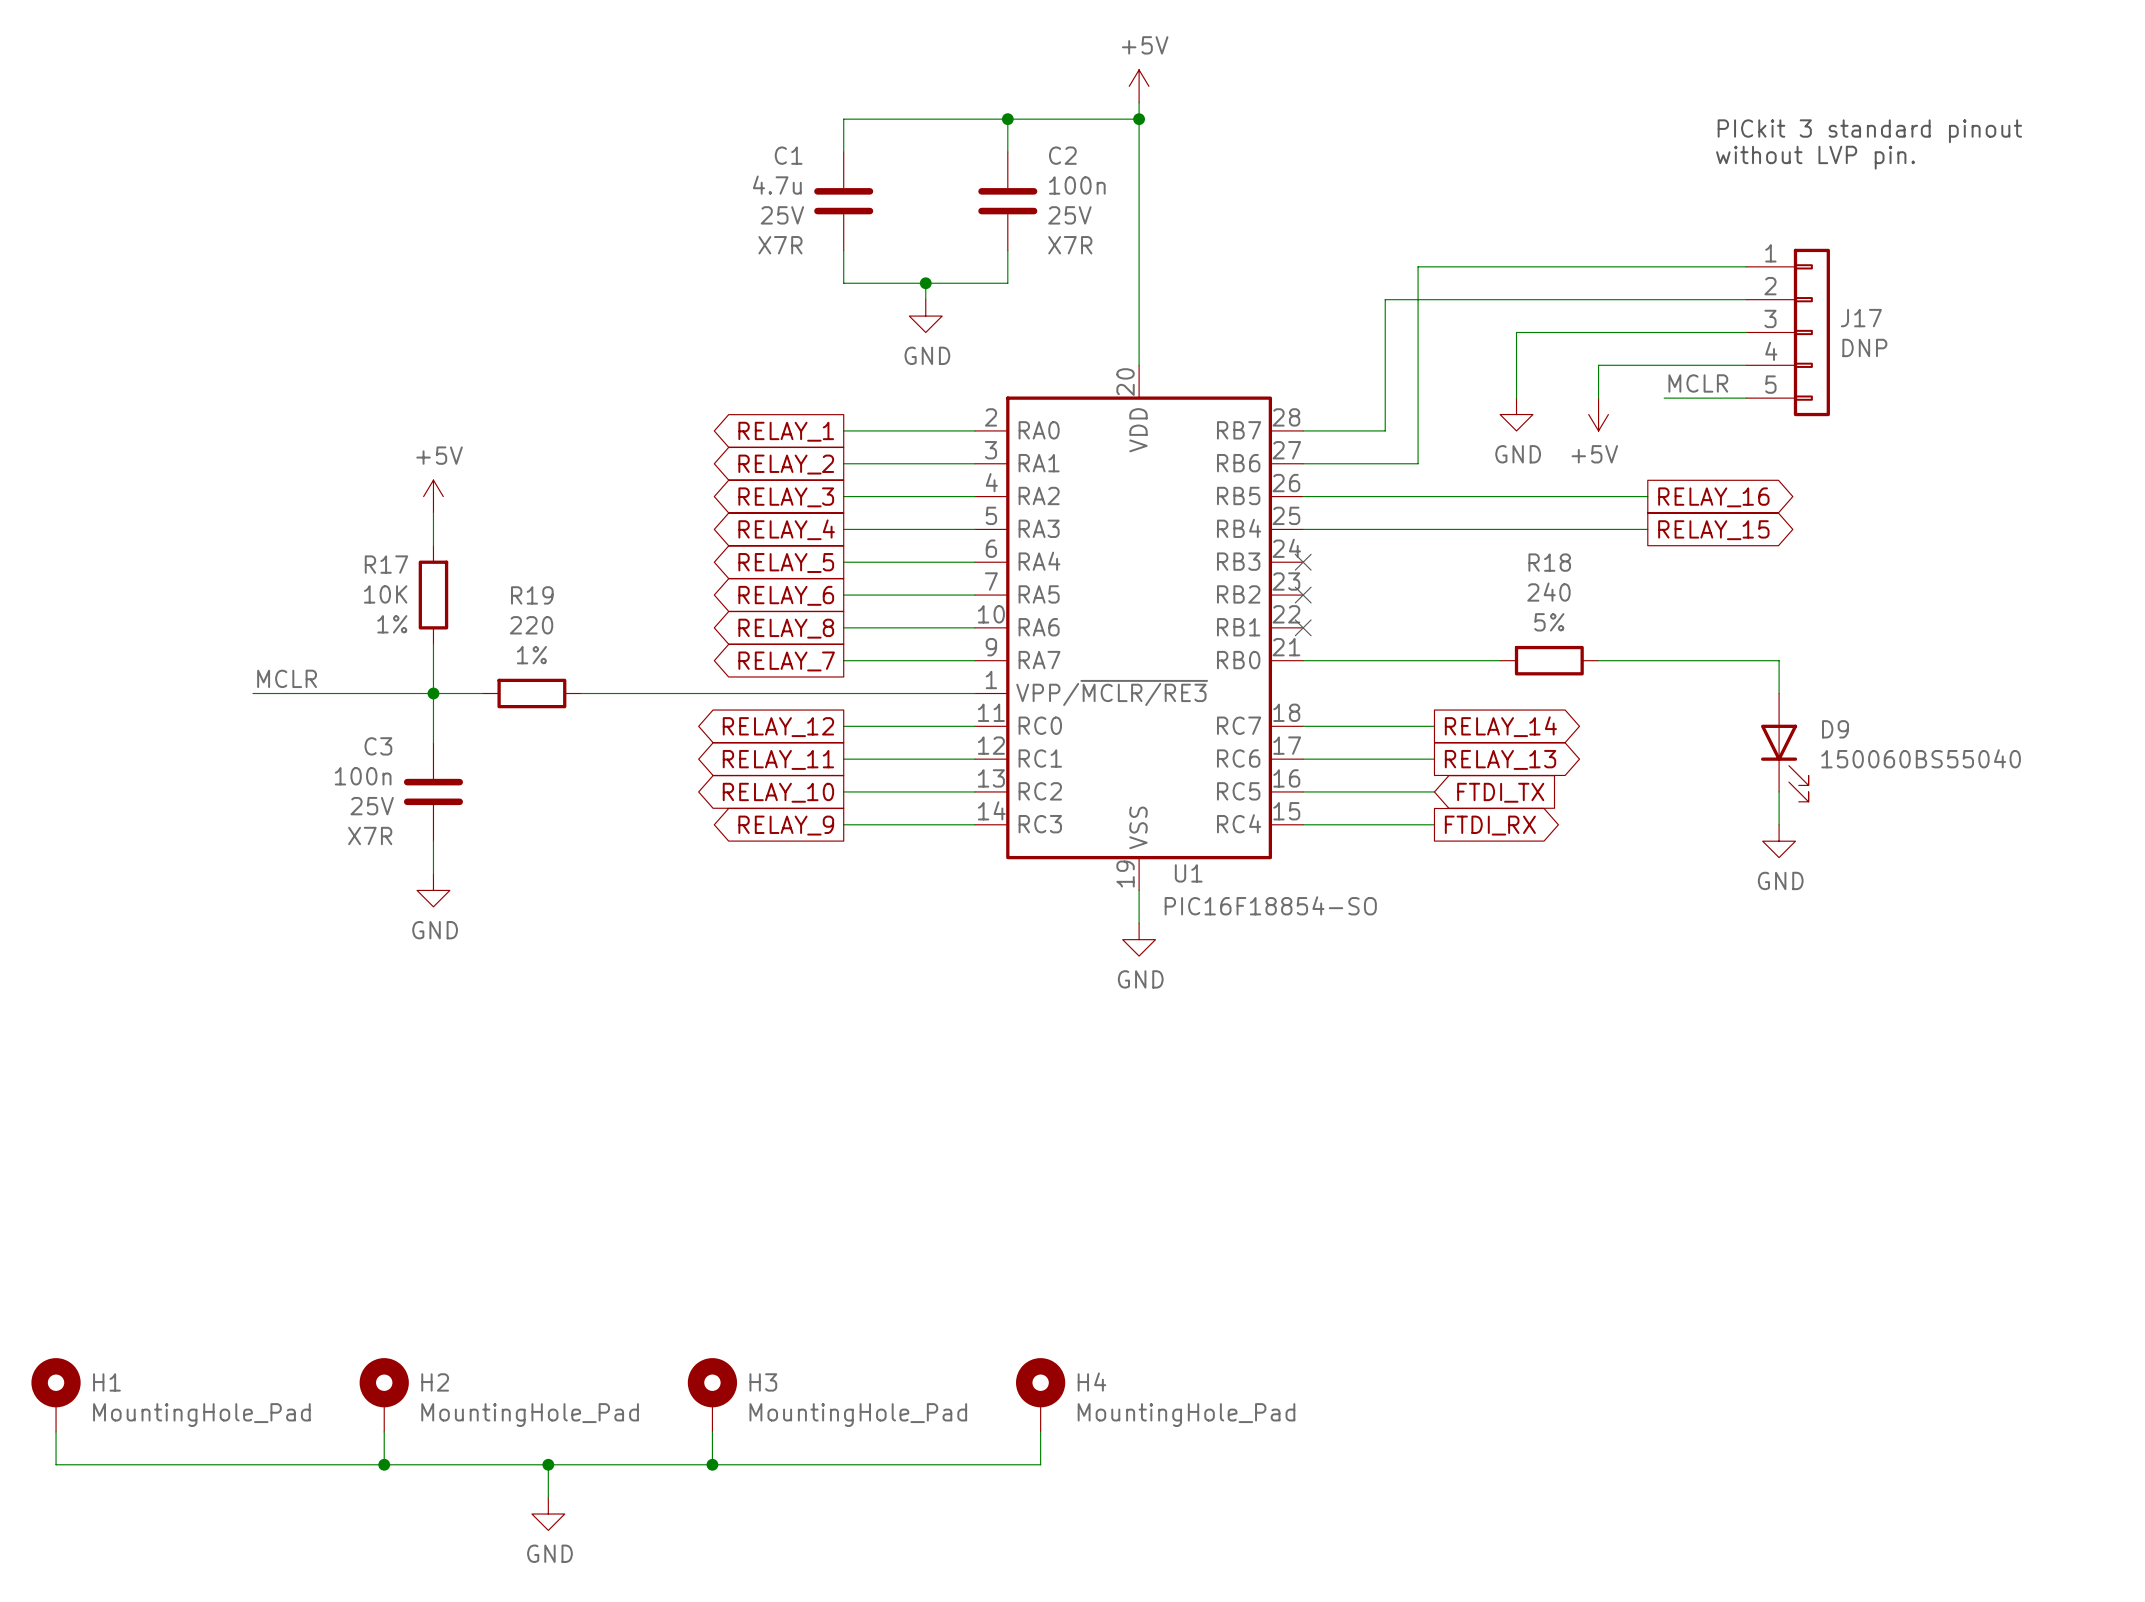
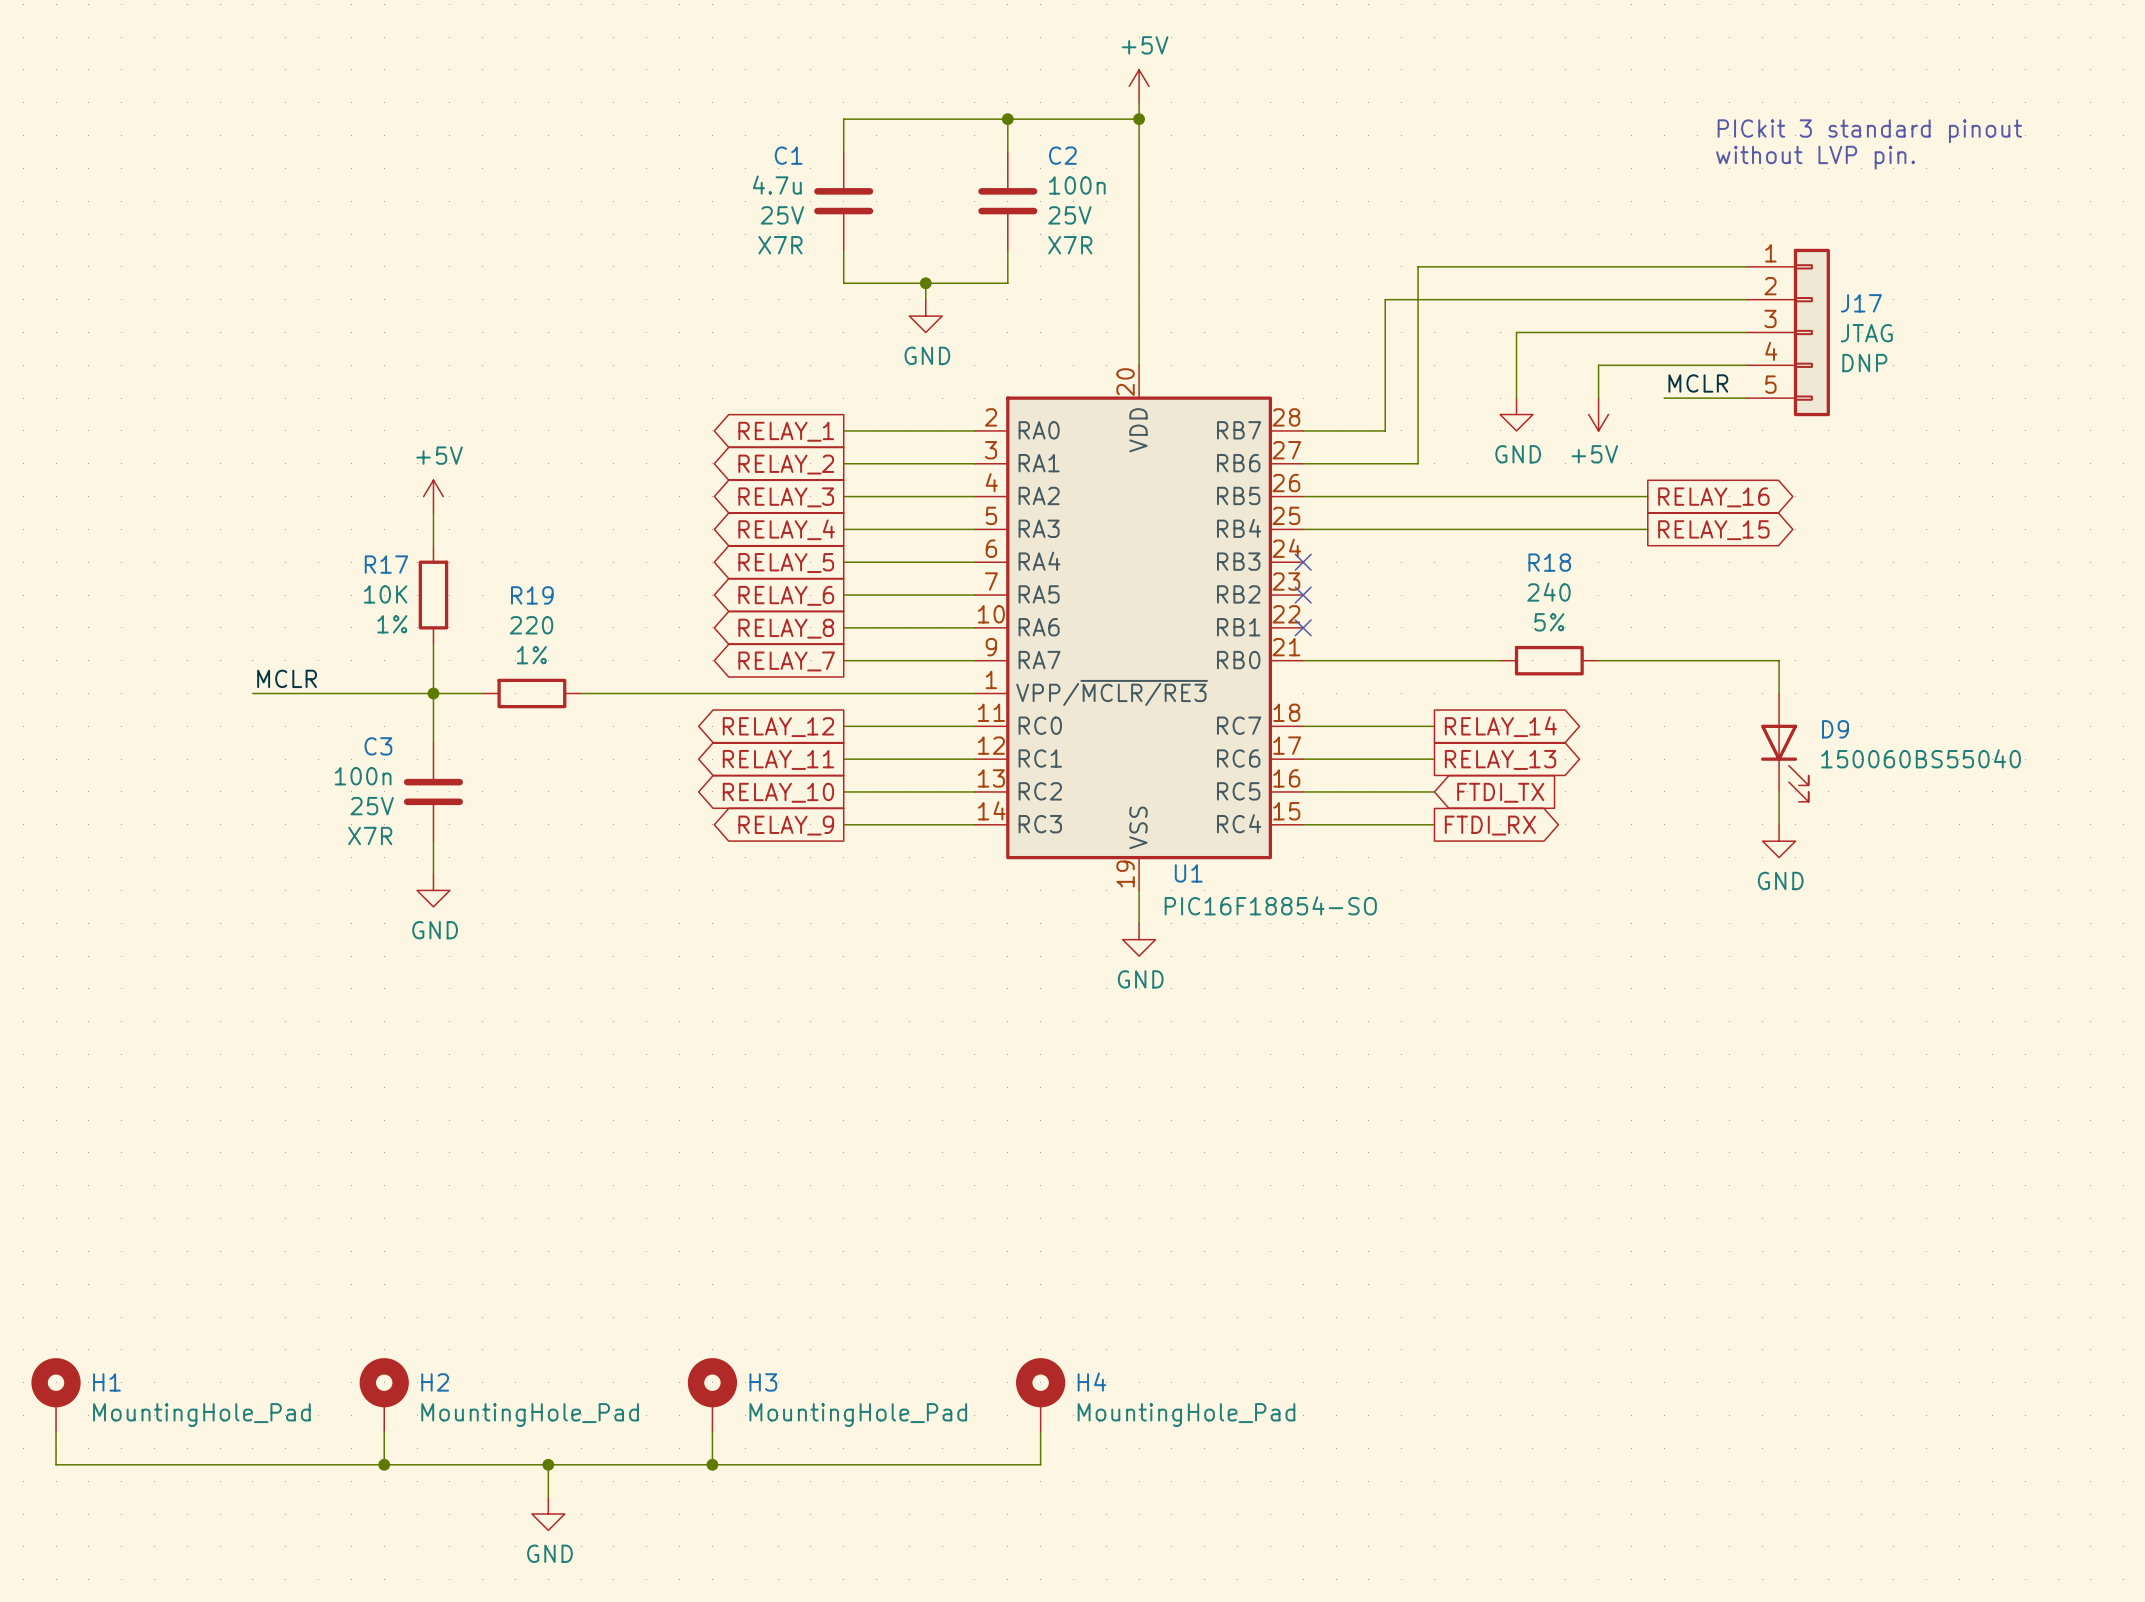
J17 name position: J17 (1861, 318) -> J17 (1861, 303)
J17 value: DNP (1864, 347) -> JTAG (1866, 333)
J17 text: none -> DNP (1864, 363)

